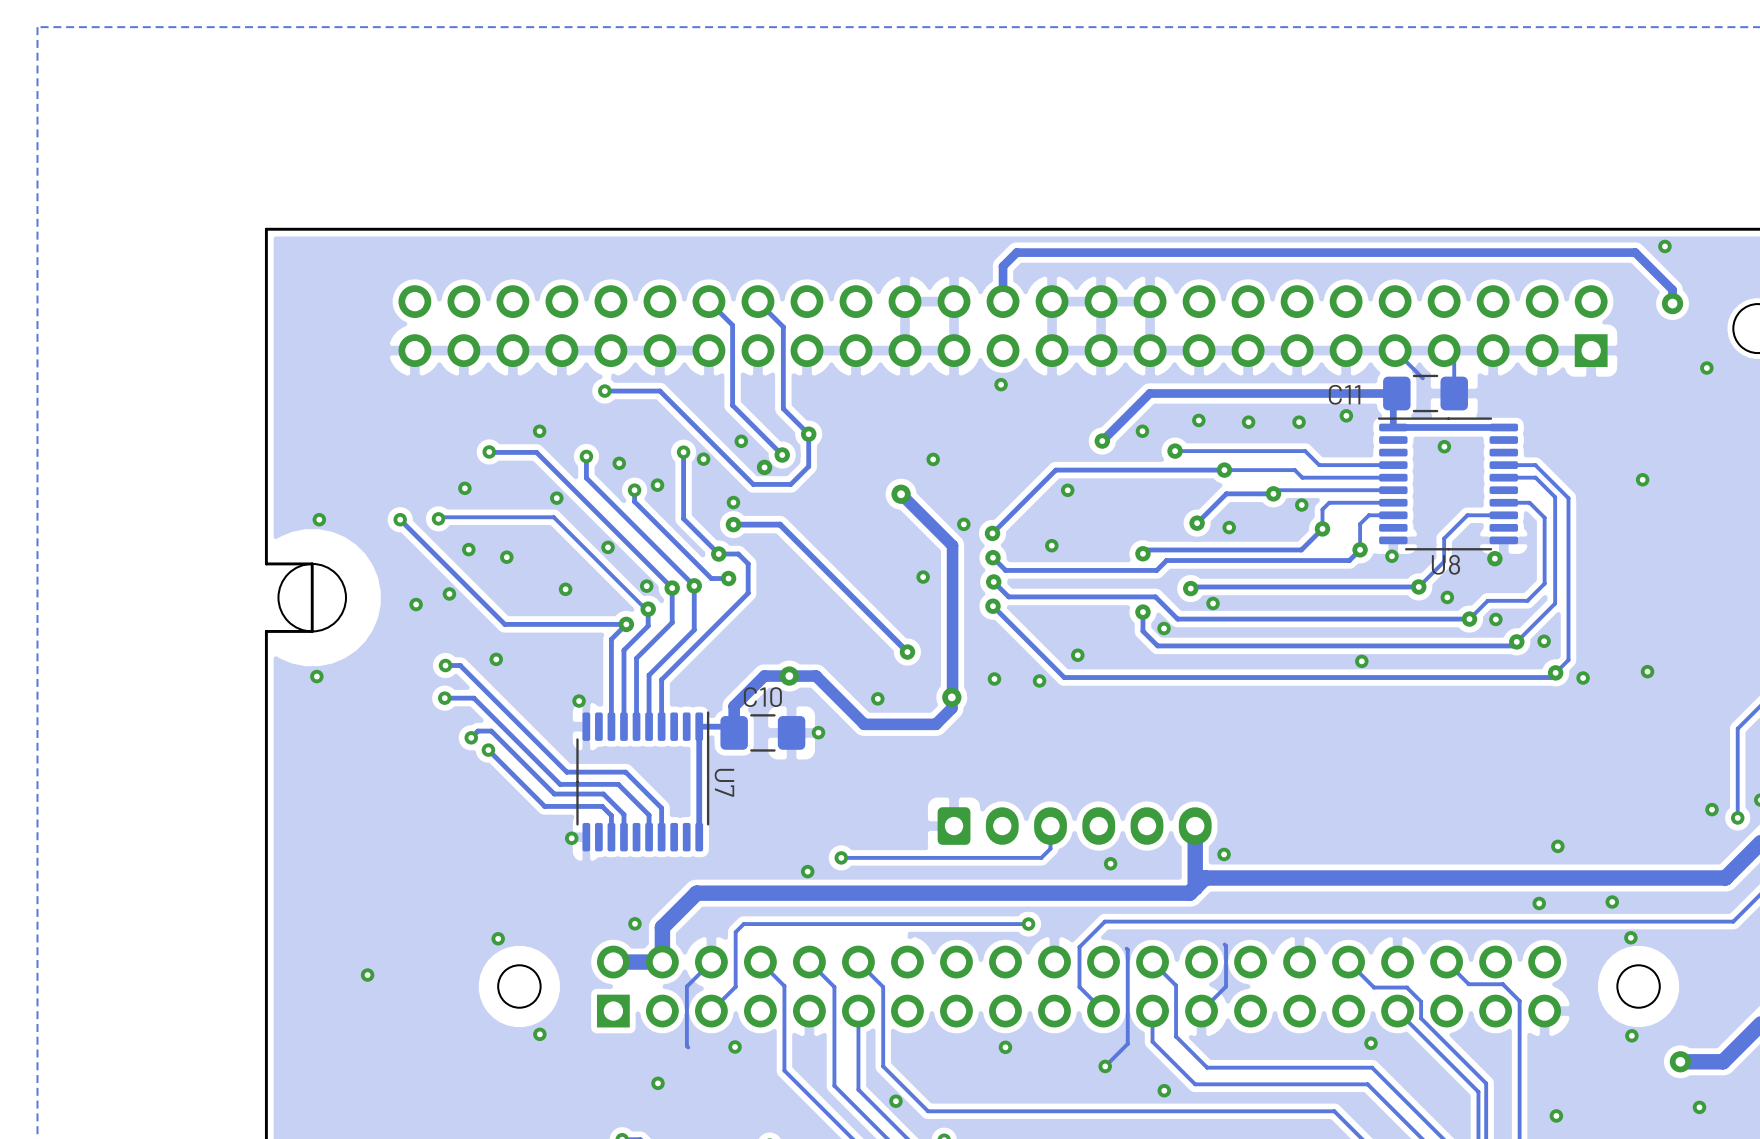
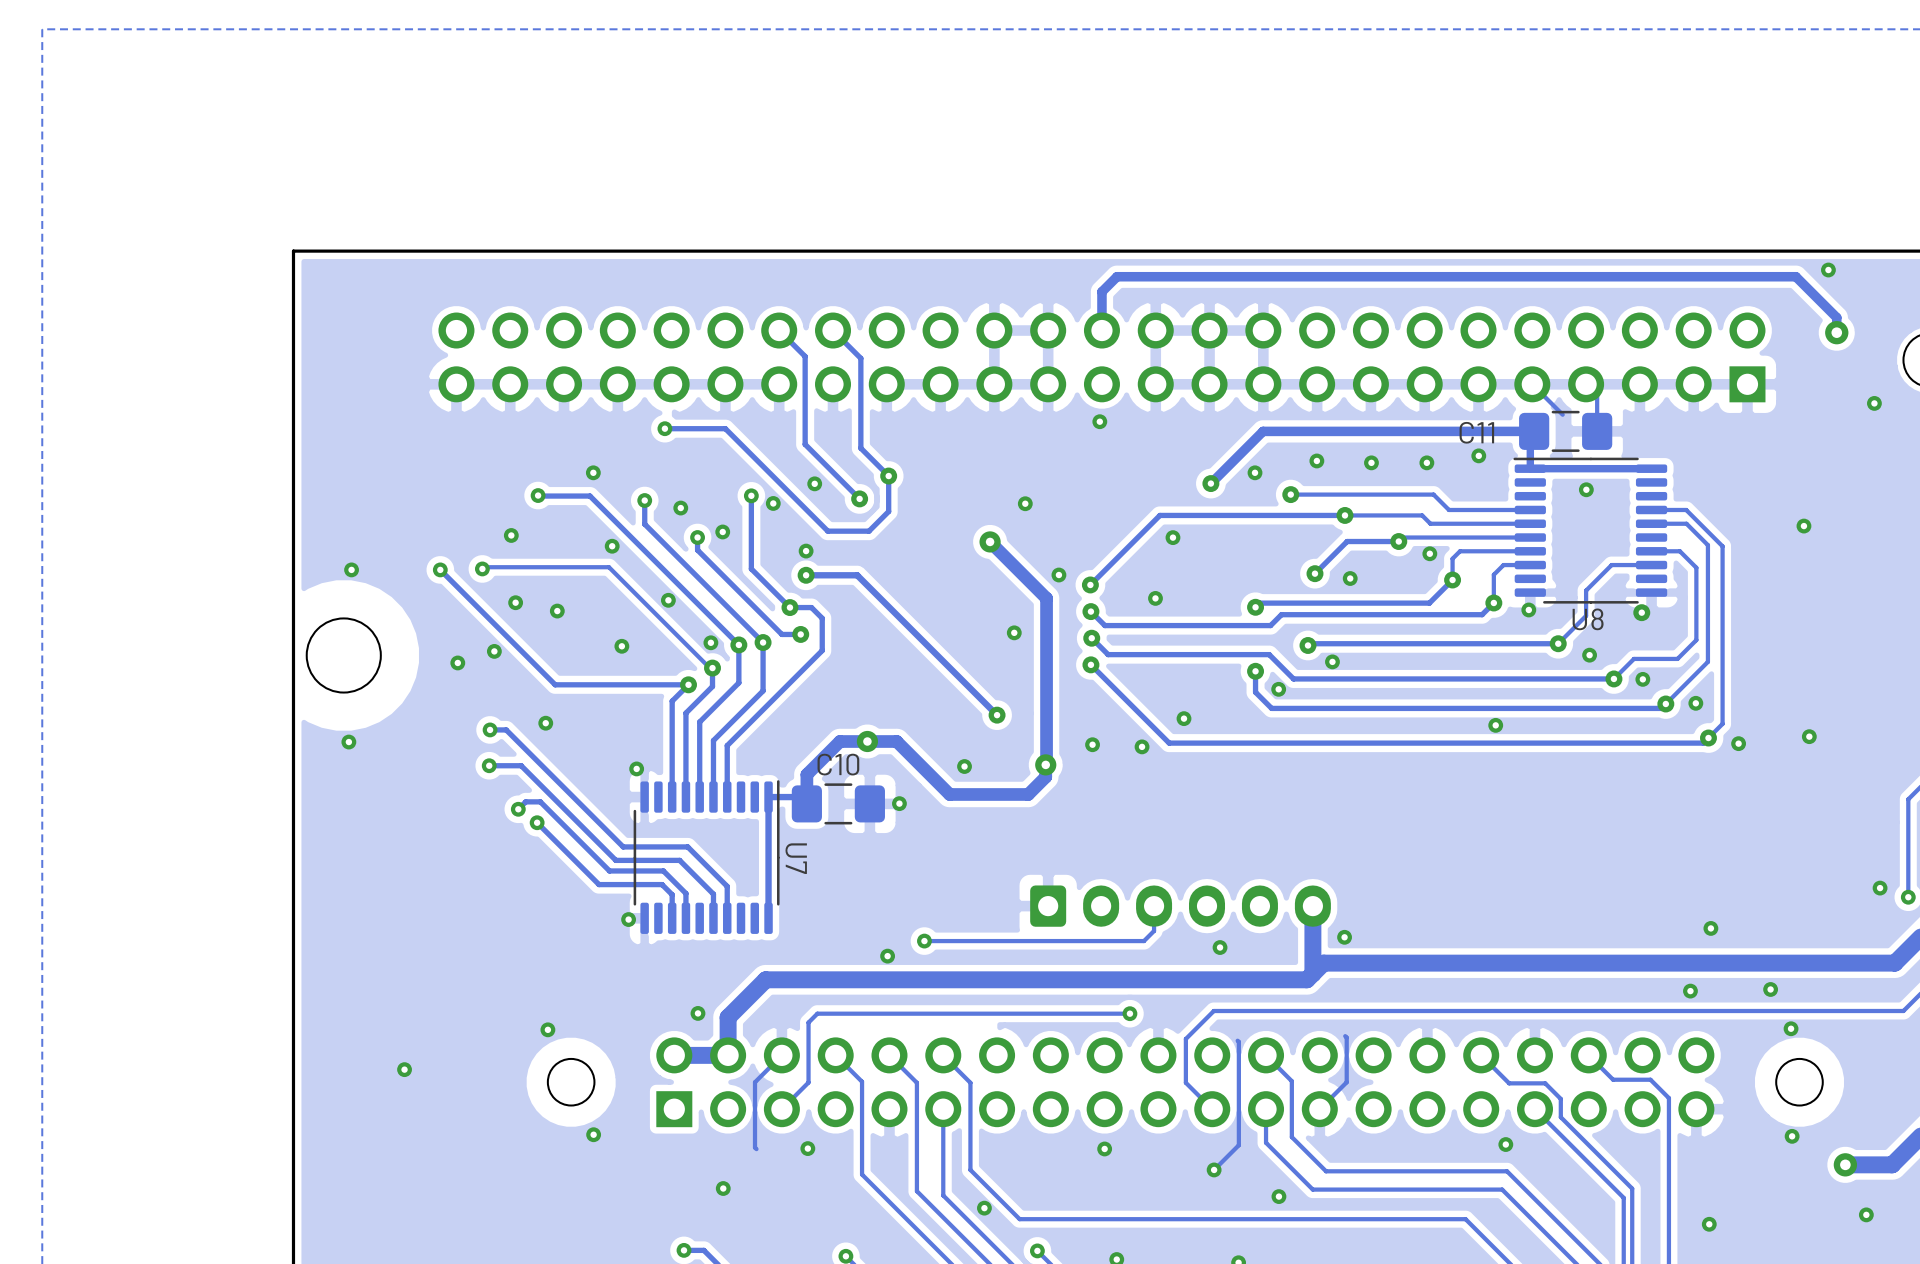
via: (764, 467) -> none
board edge: (266, 563) (312, 563) (312, 631) (266, 631) -> (293, 618) (293, 692)

